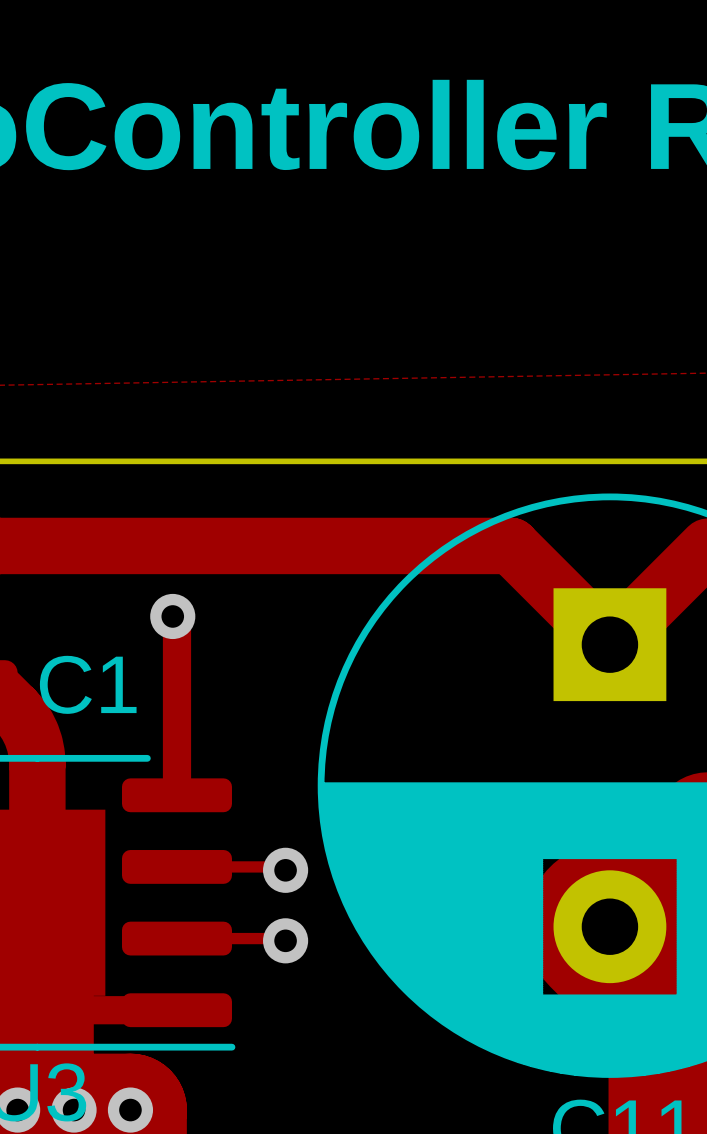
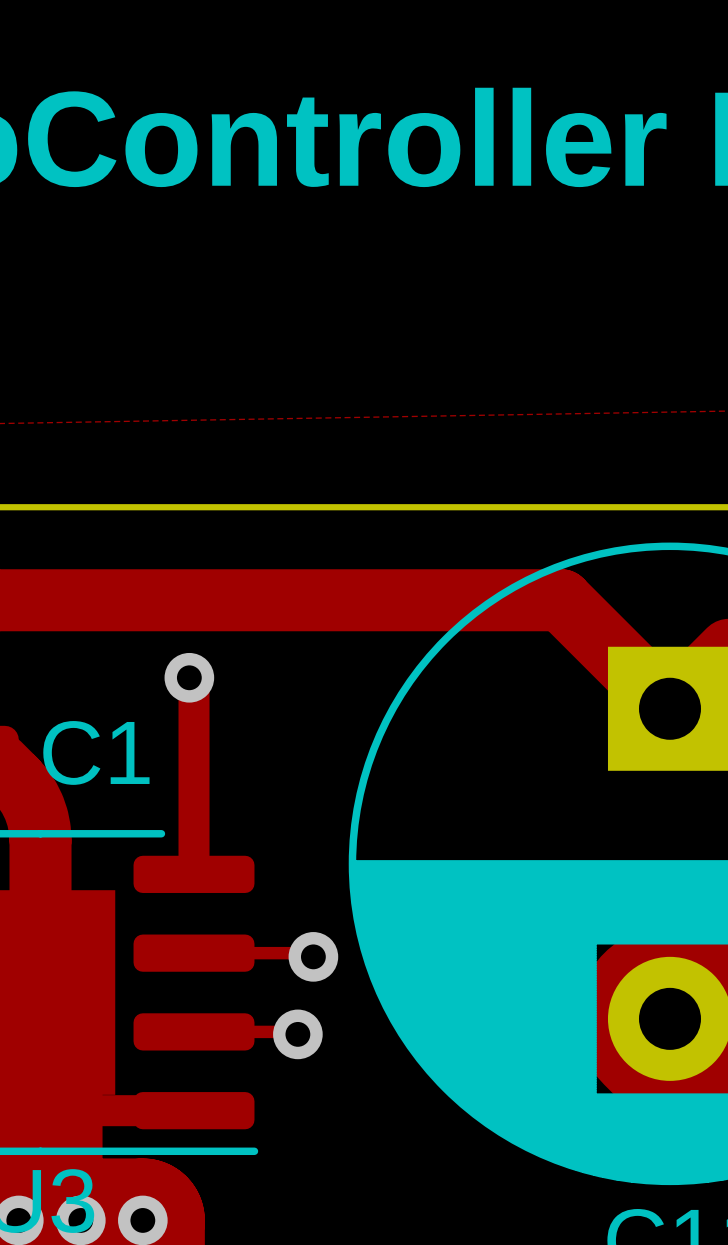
via position: (285, 940) -> (297, 1034)

